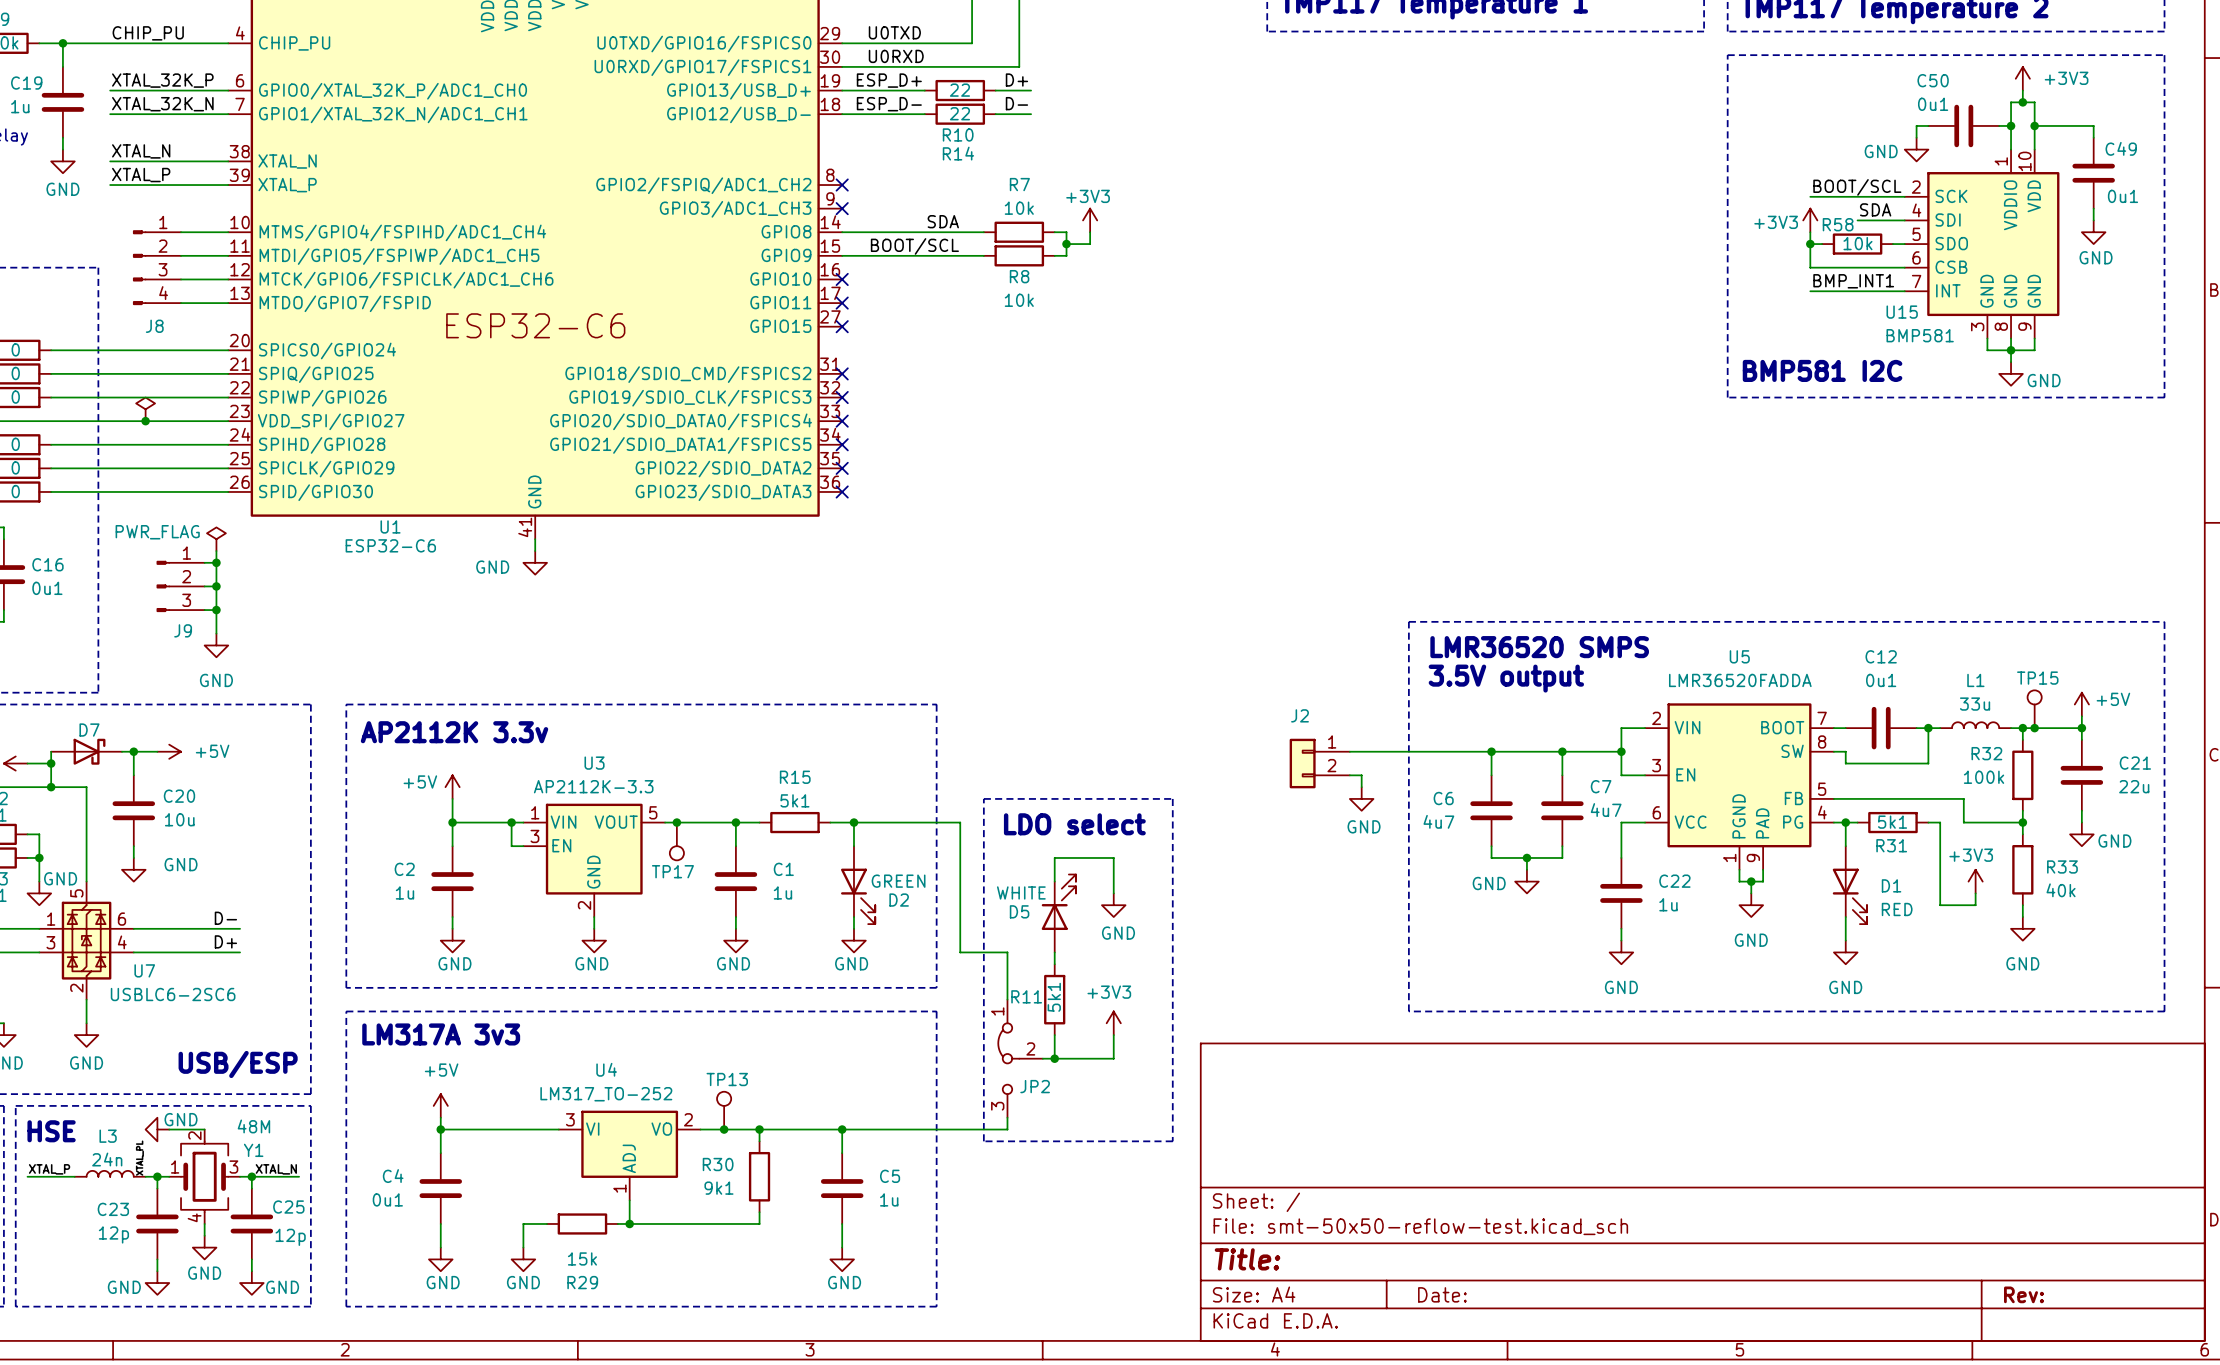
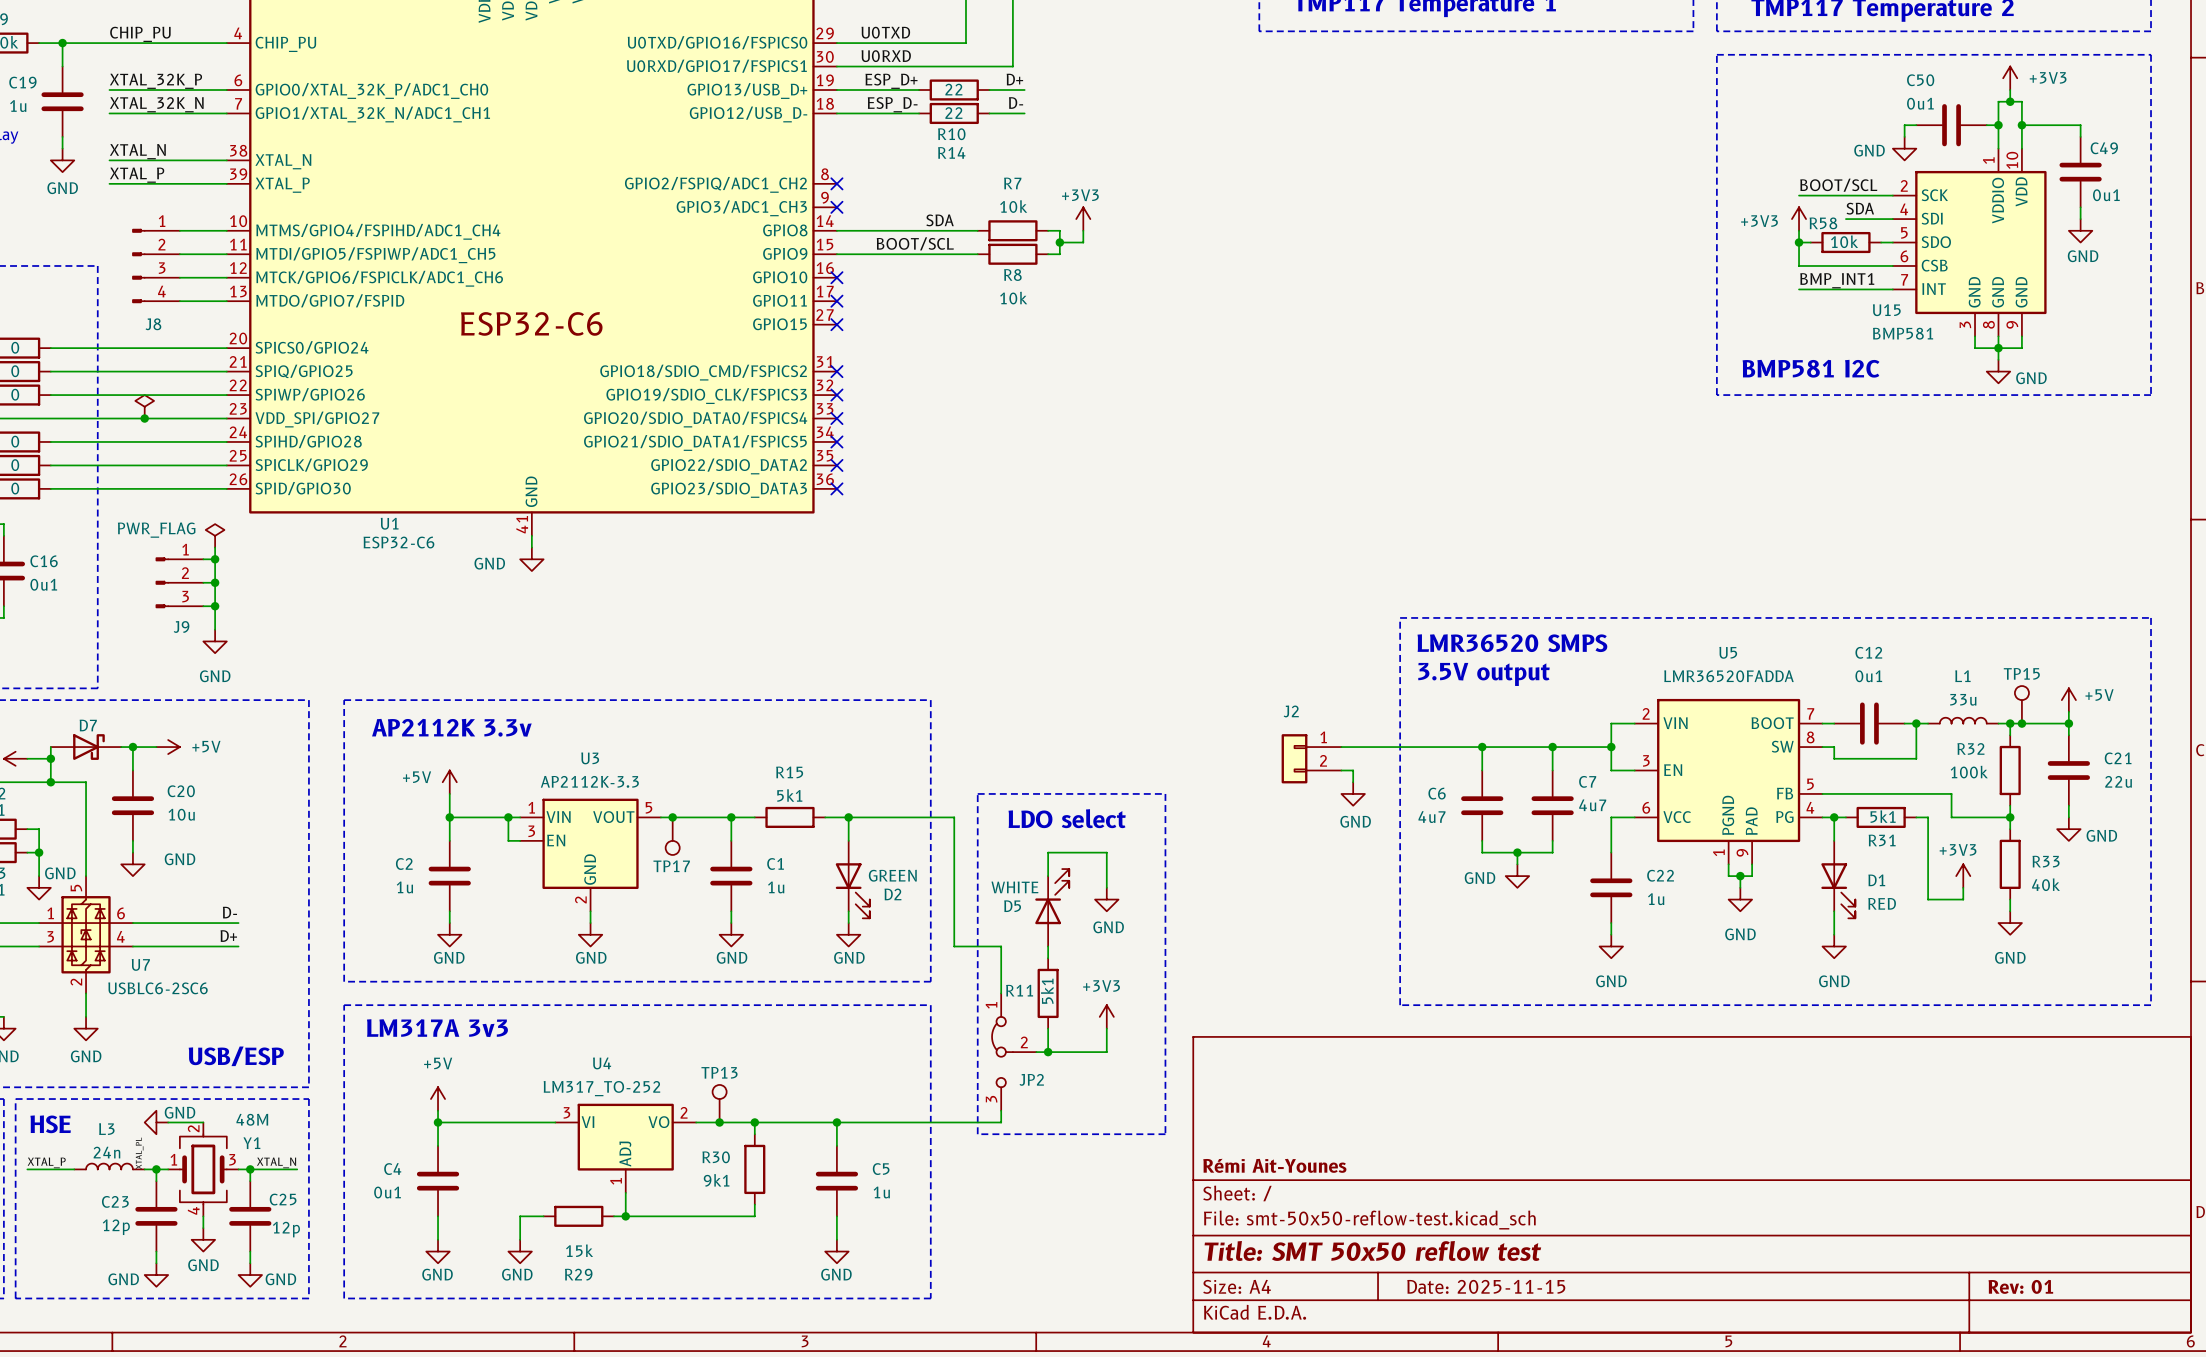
title block: none -> Rémi Ait-Younes (1274, 1165)
title block: Title: (1247, 1259) -> Title: SMT 50x50 reflow test (1372, 1250)
title block: Date: (1442, 1294) -> Date: 2025-11-15 (1486, 1286)
title block: Rev: (2023, 1294) -> Rev: 01 (2020, 1286)

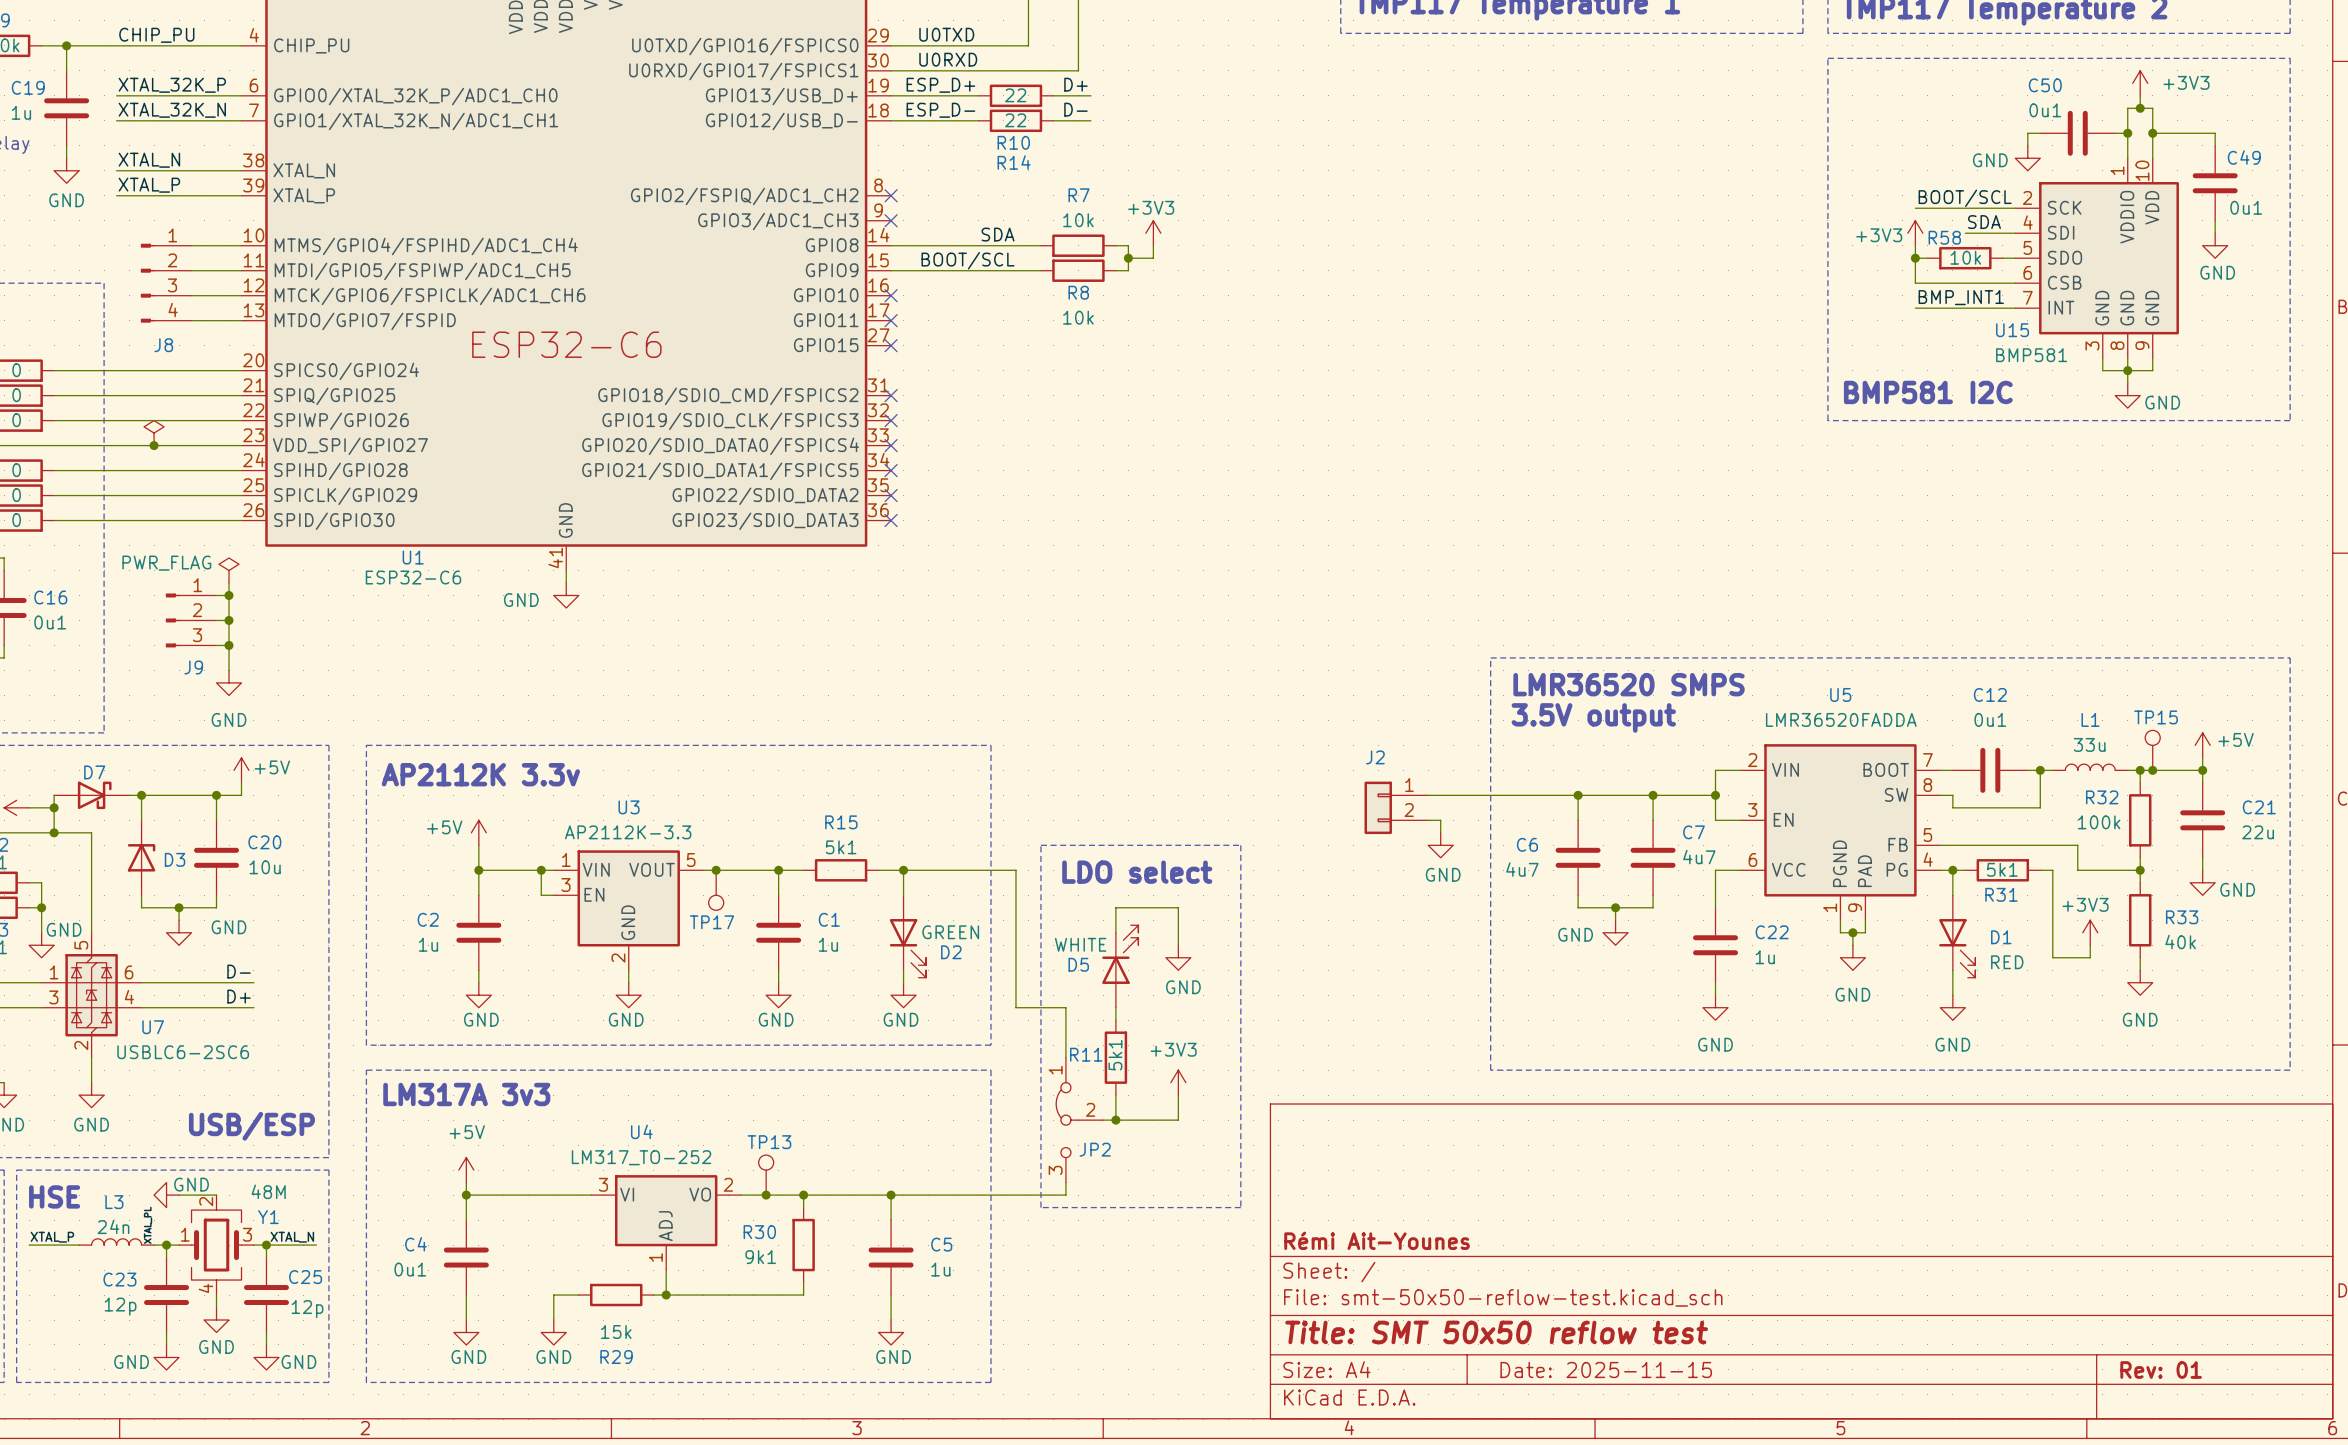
wire: none -> (241, 782) (241, 795) (166, 795)
power symbol rotation: 0° (168, 747) -> 90° counterclockwise (241, 770)
power symbol position: +5V (168, 747) -> +5V (241, 770)
wire: none -> (216, 795) (216, 820)
junction: none -> (216, 795)
C20 position: (132, 805) -> (216, 857)
D3: none -> (141, 857)
wire: none -> (216, 895) (216, 907) (141, 907)
wire: none -> (179, 907) (179, 920)
junction: none -> (179, 907)
power symbol position: GND (132, 864) -> GND (179, 932)

